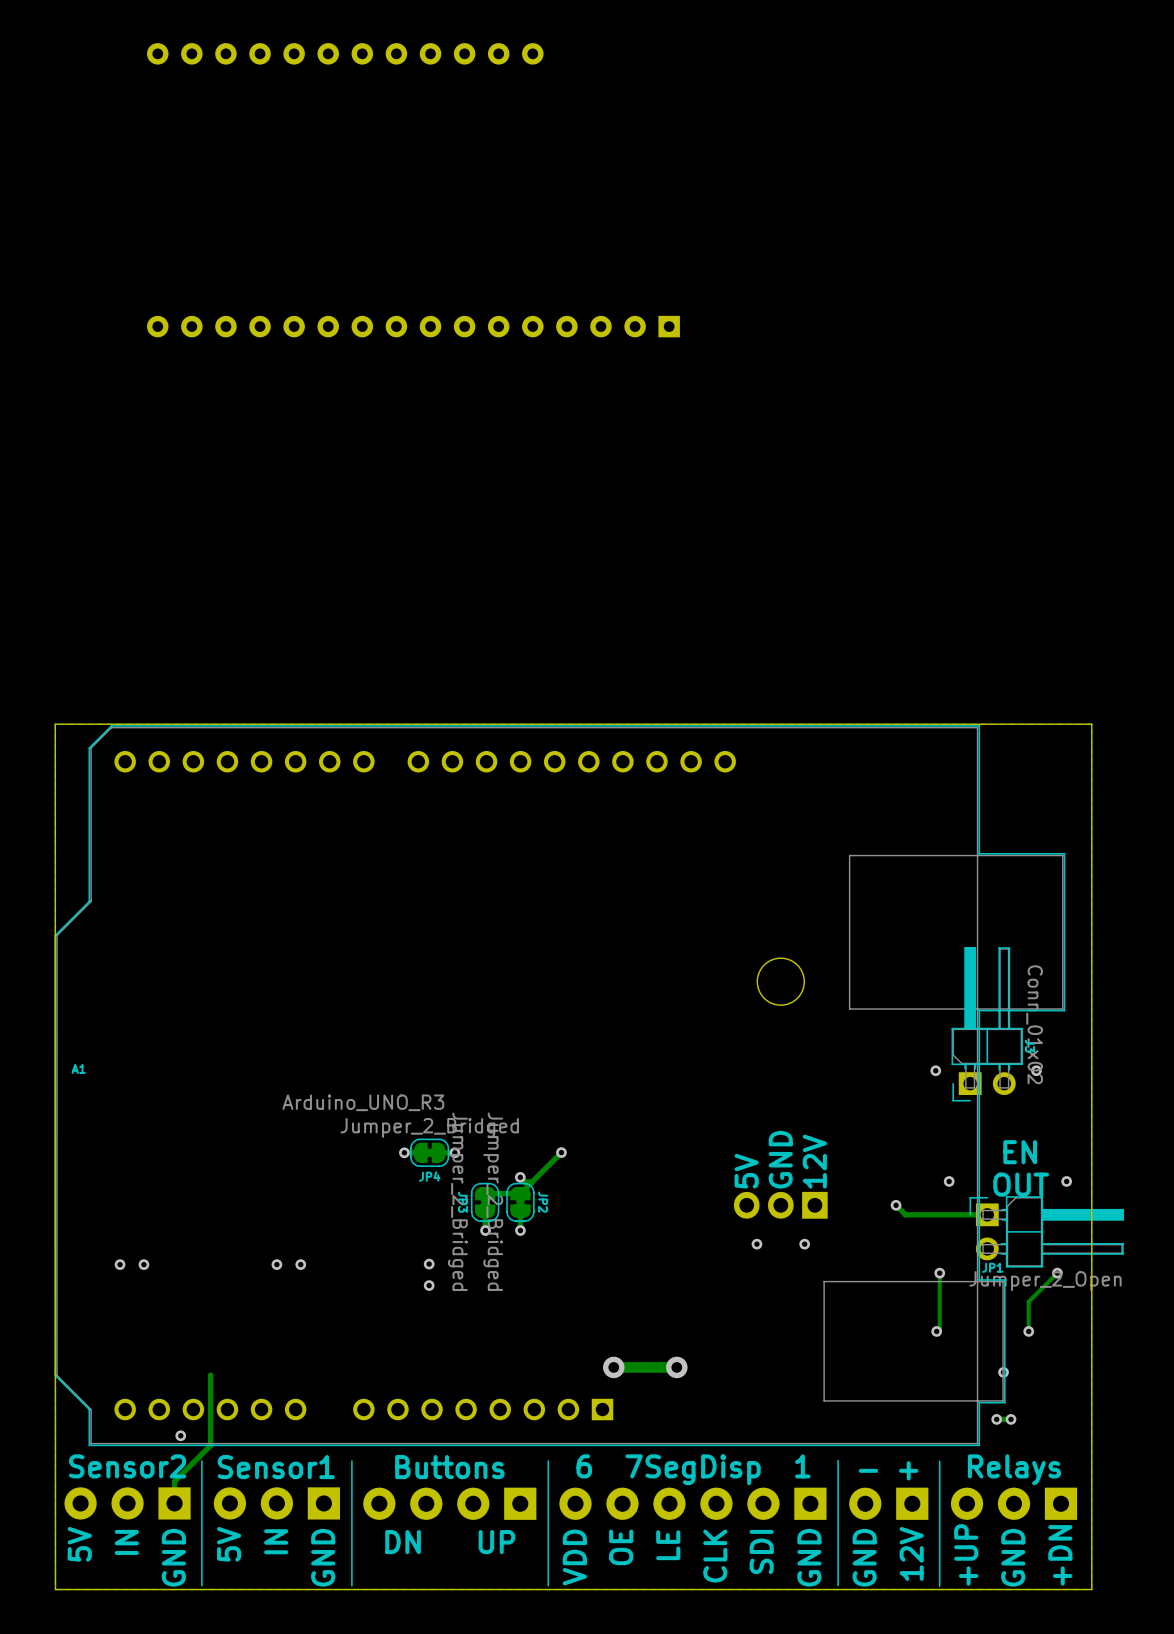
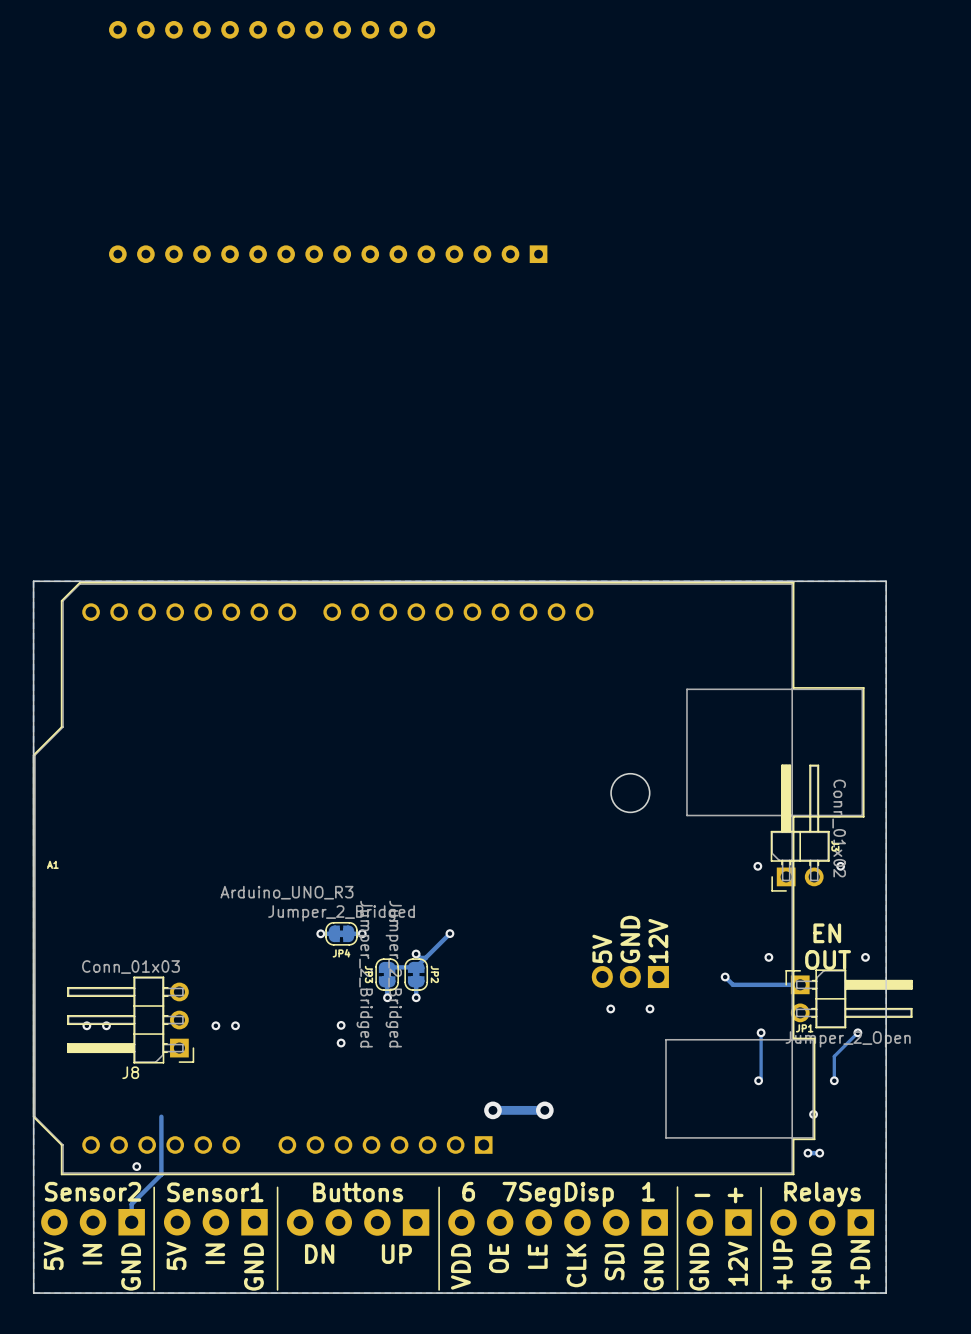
J8: none -> Conn_01x03 (130, 1020)

